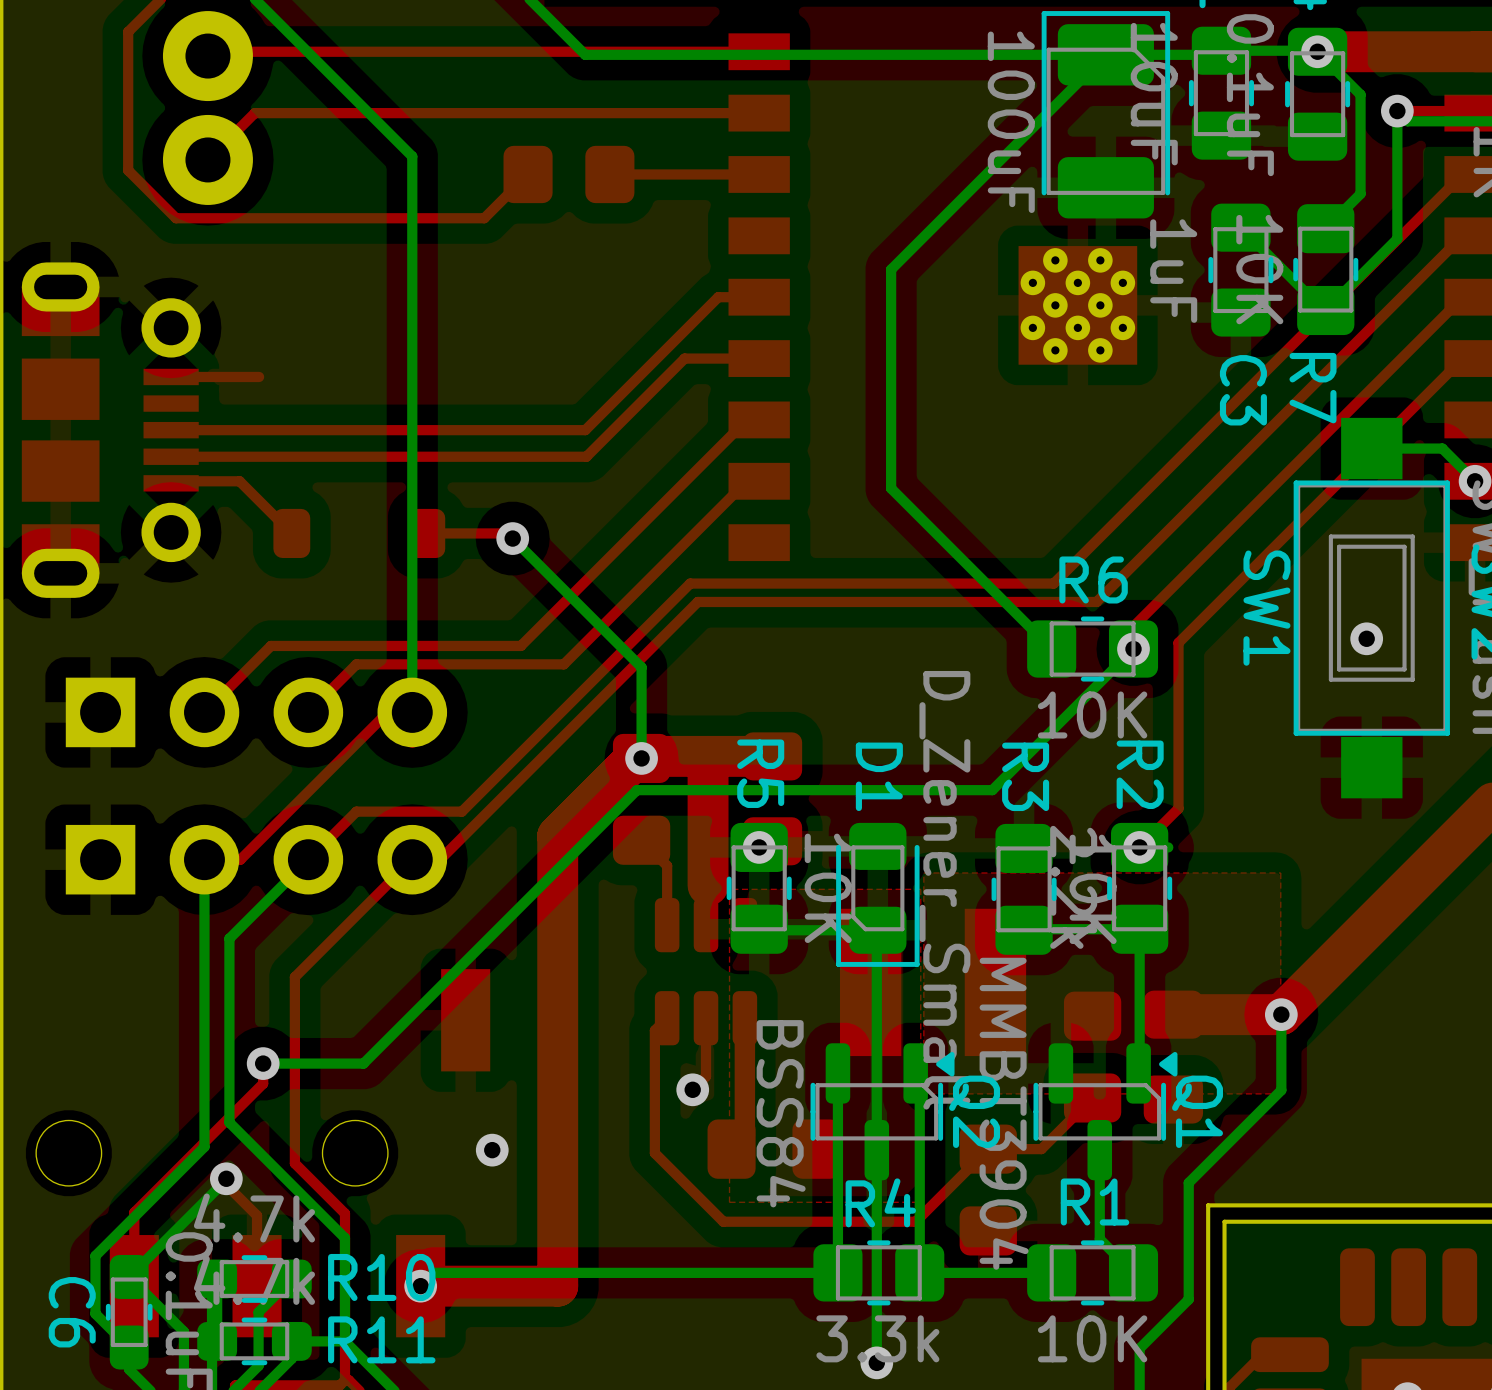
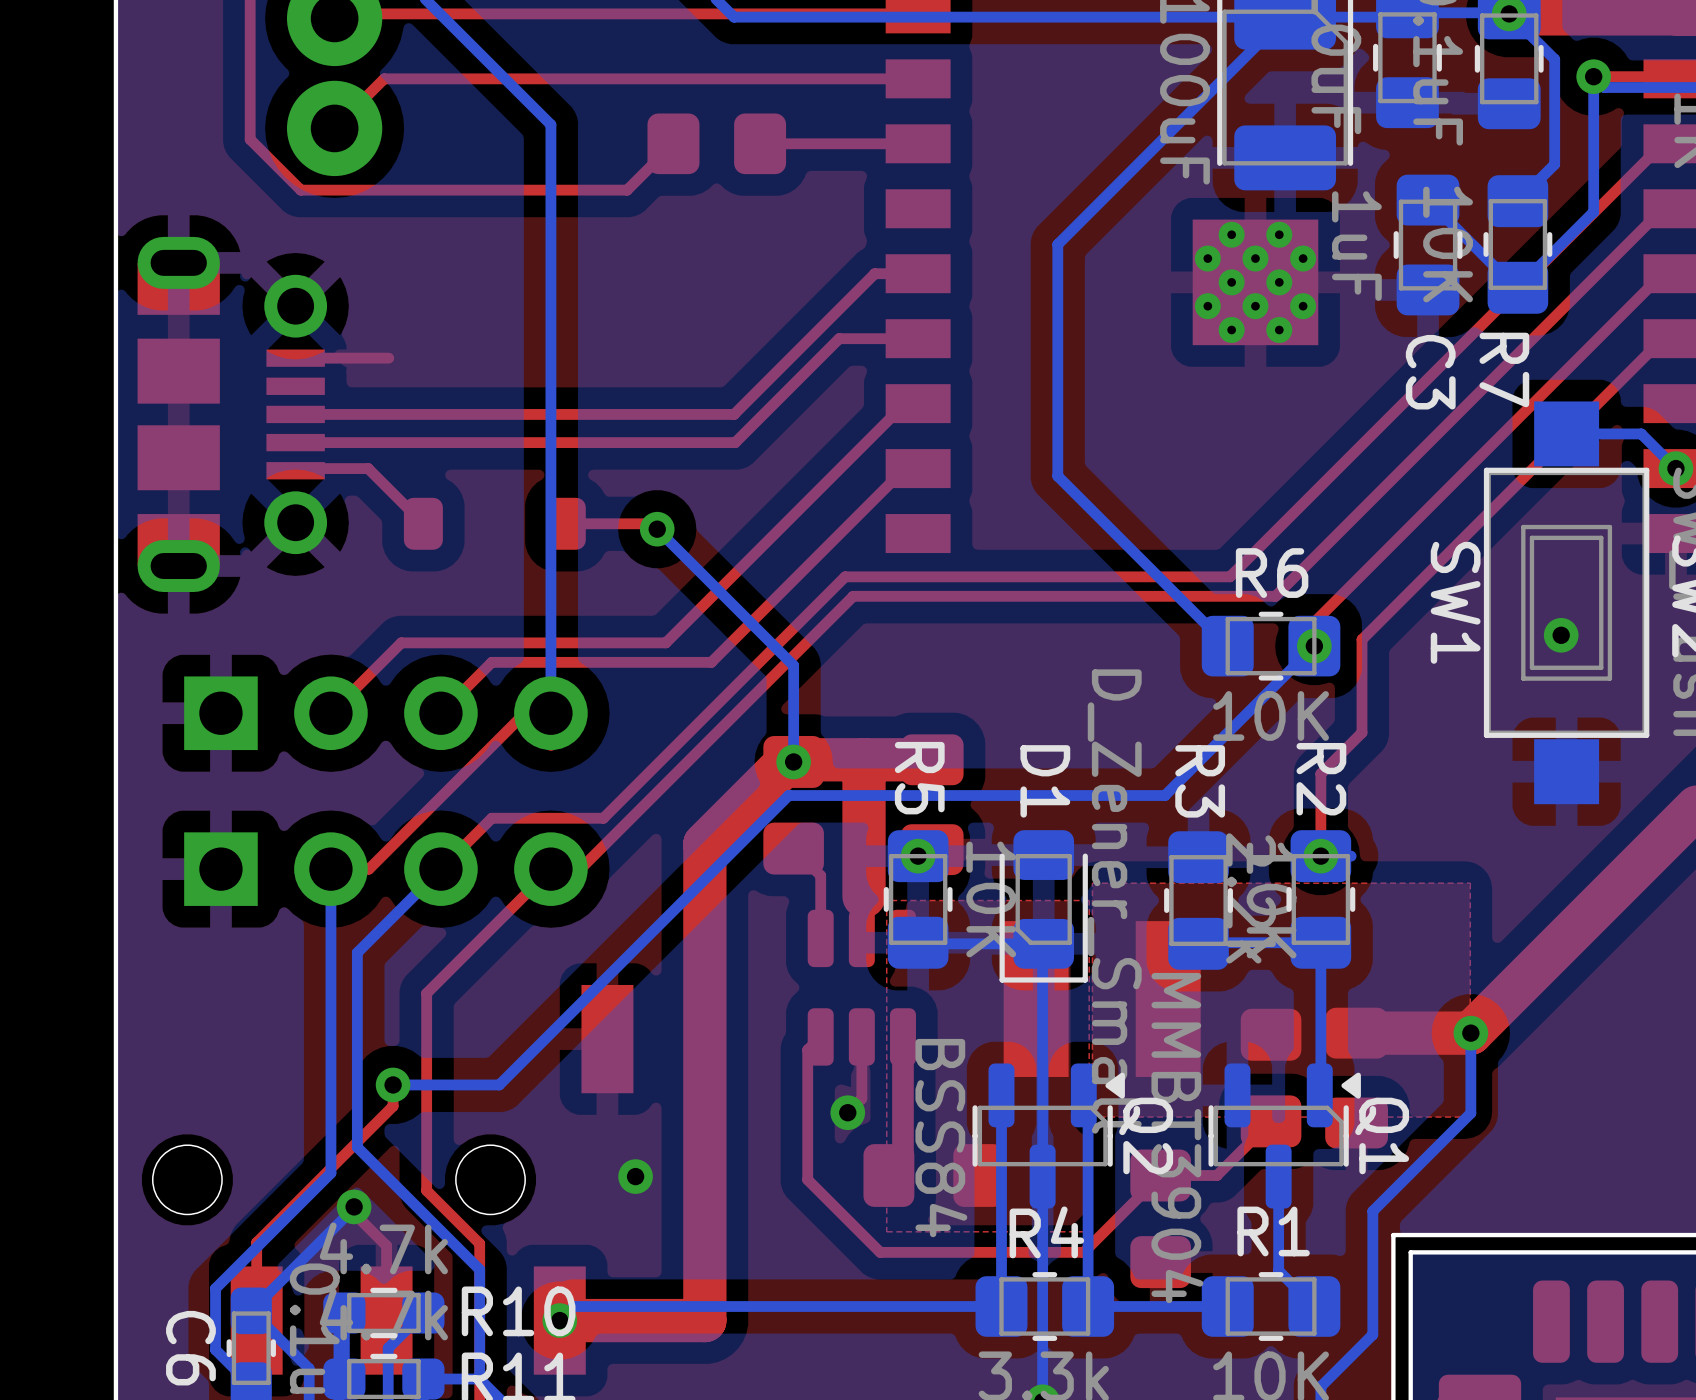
top track: (1178, 730) (1178, 808) (1139, 847) -> (1362, 732) (1320, 773) (1320, 856)

